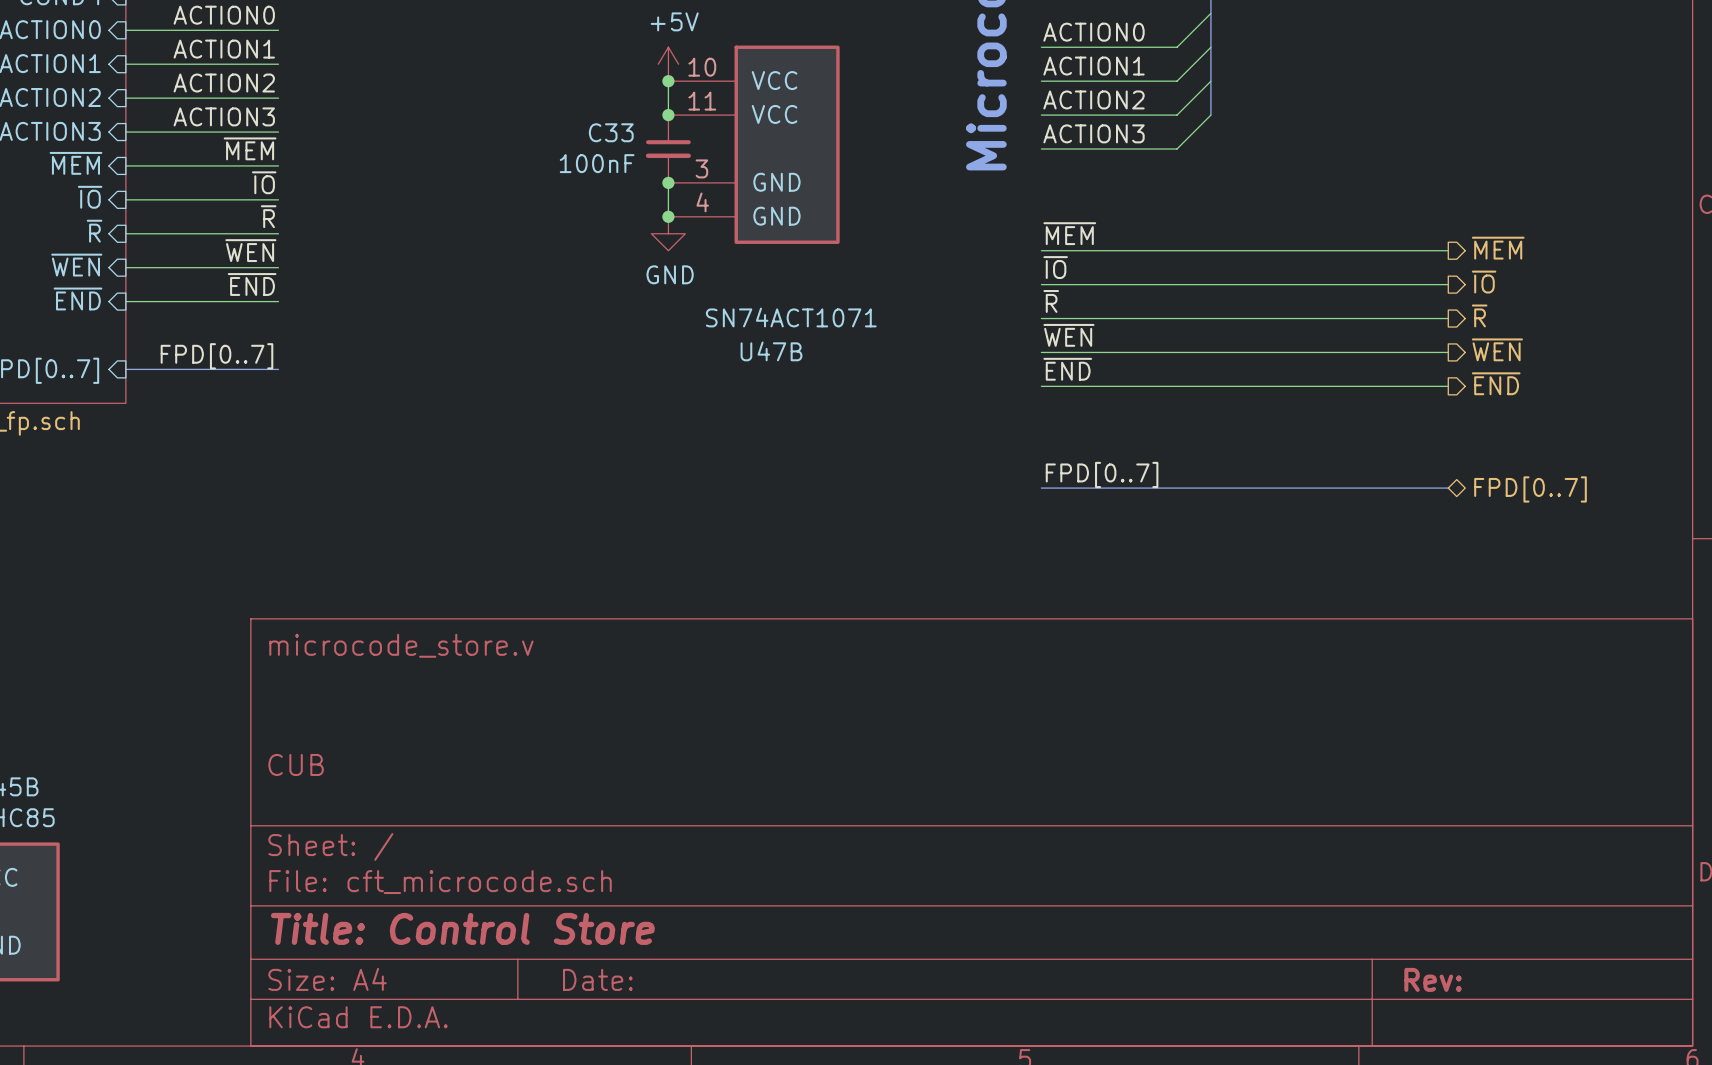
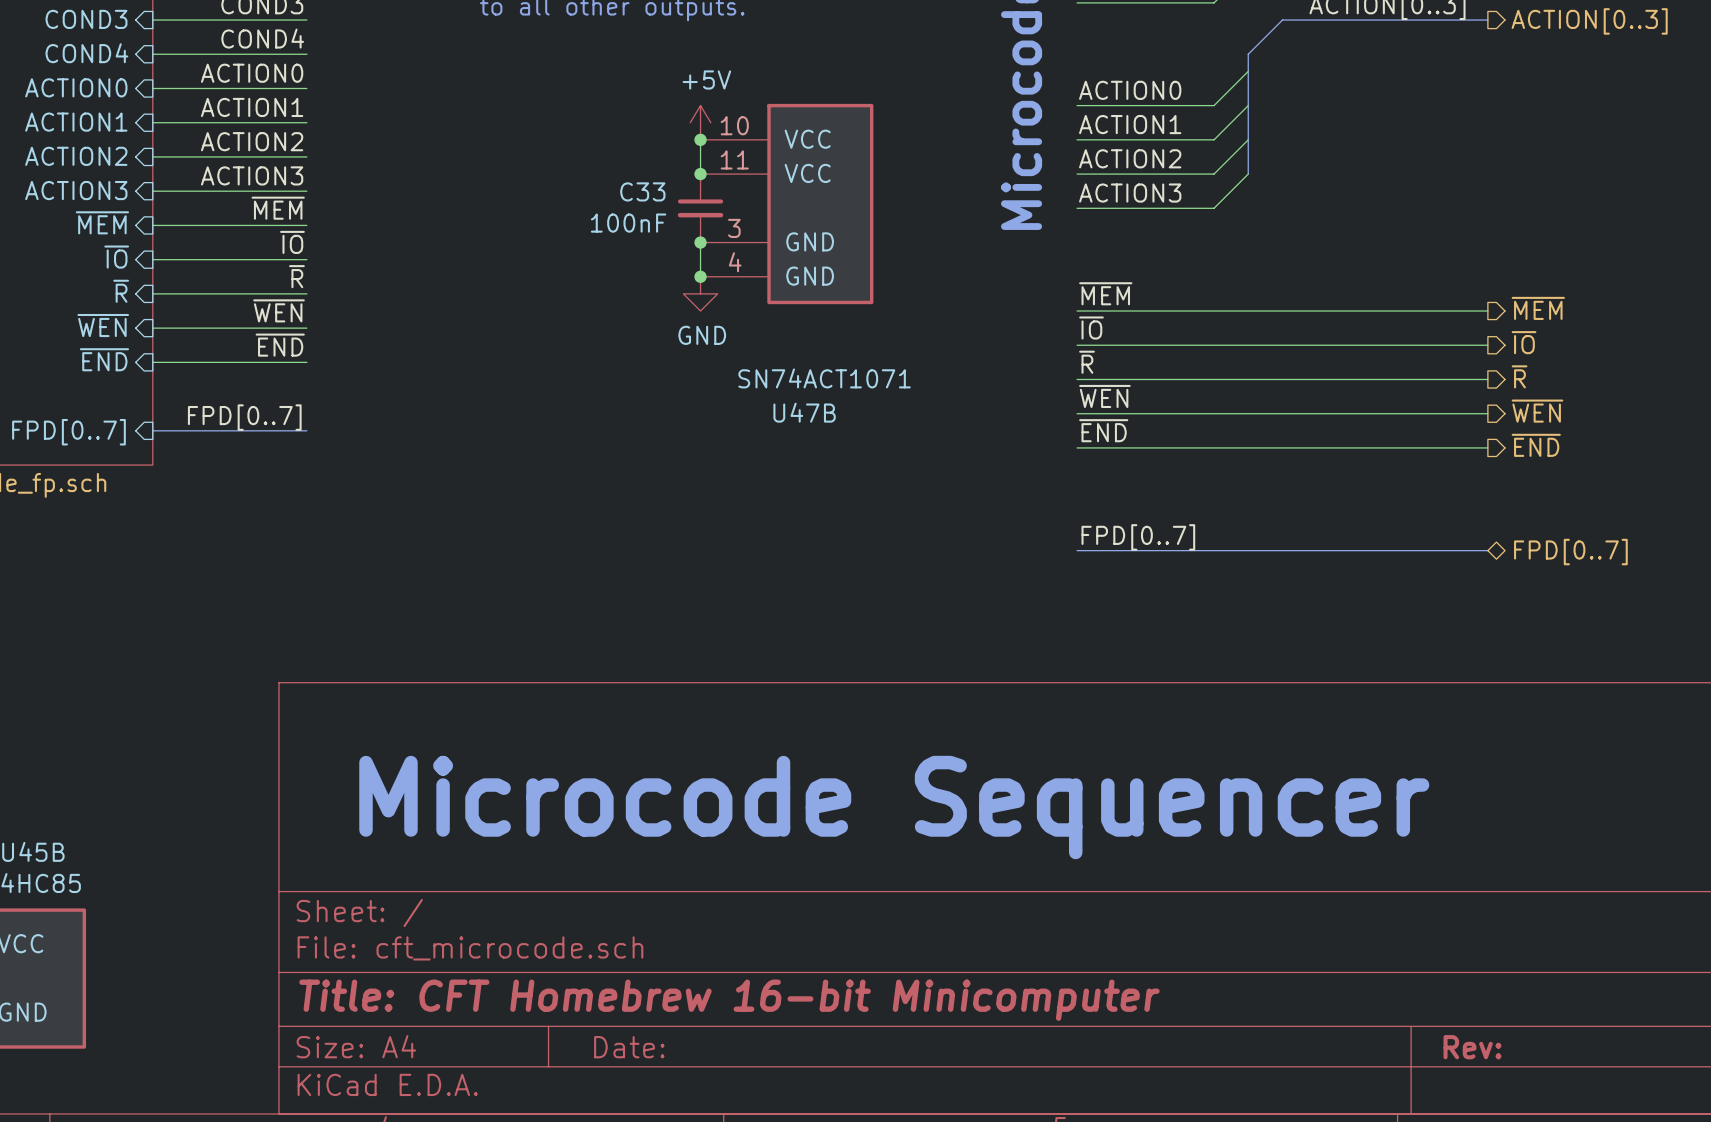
title block: microcode_store.v (401, 645) -> none
text: none -> Microcode Sequencer (894, 807)
title block: CUB (296, 764) -> none
title block: Title: Control Store (462, 928) -> Title: CFT Homebrew 16-bit Minicomputer (729, 1000)

